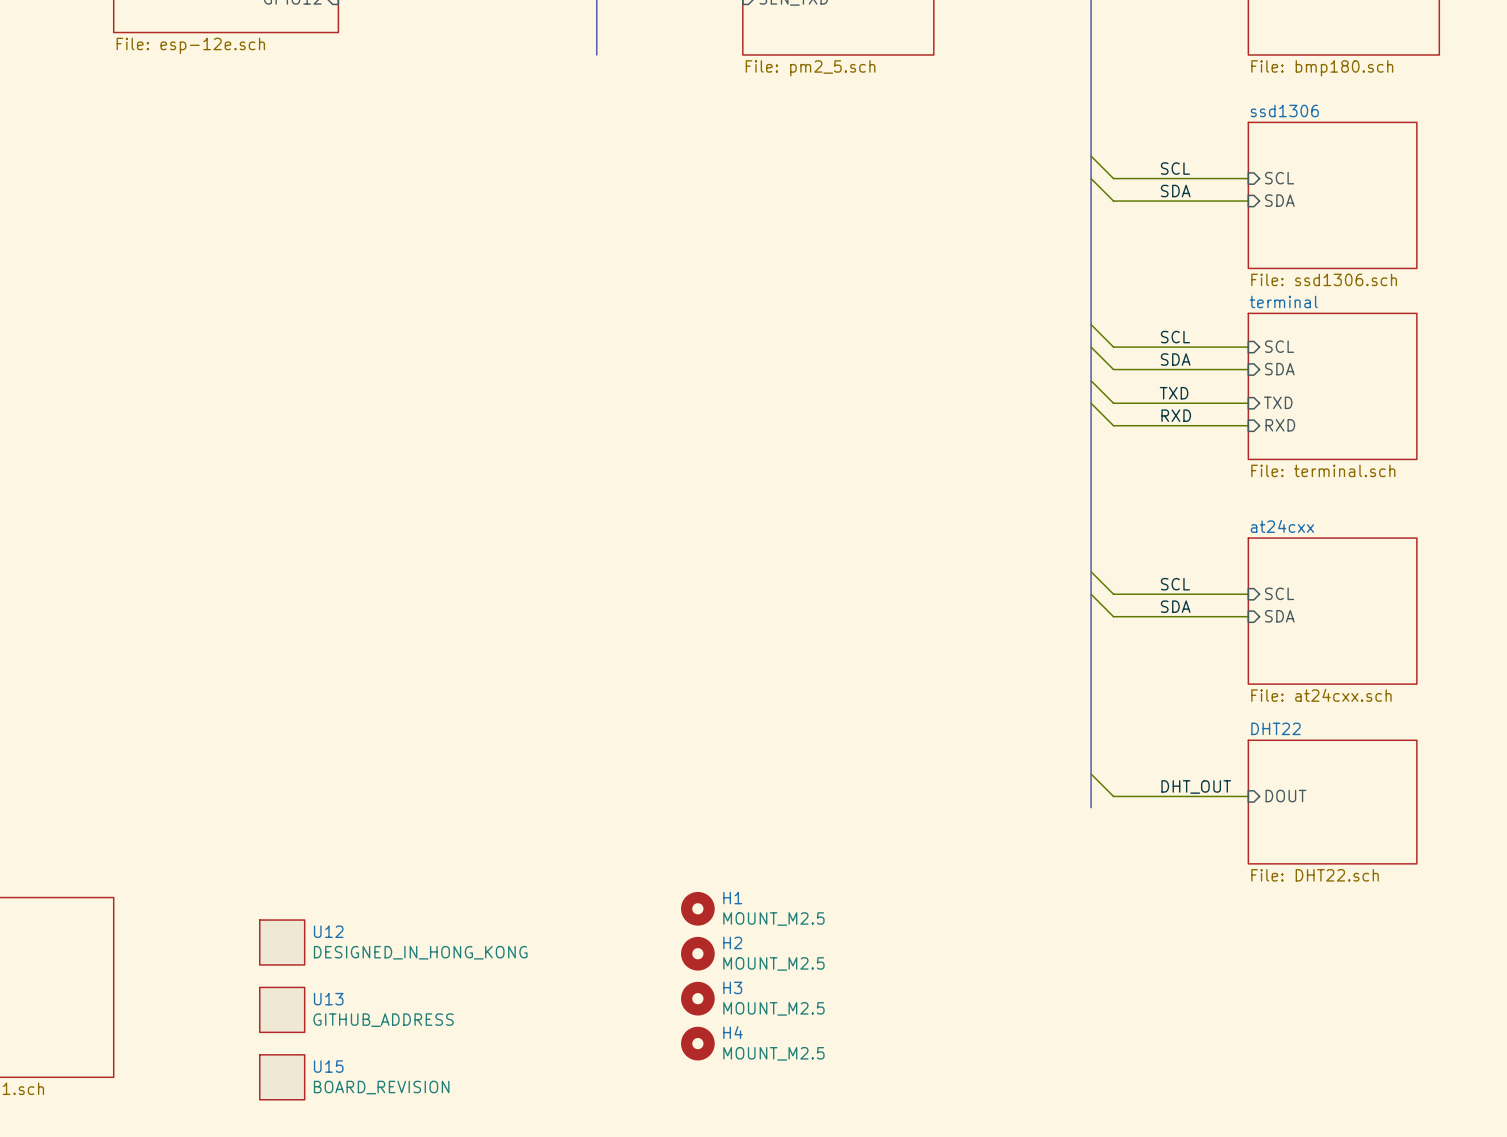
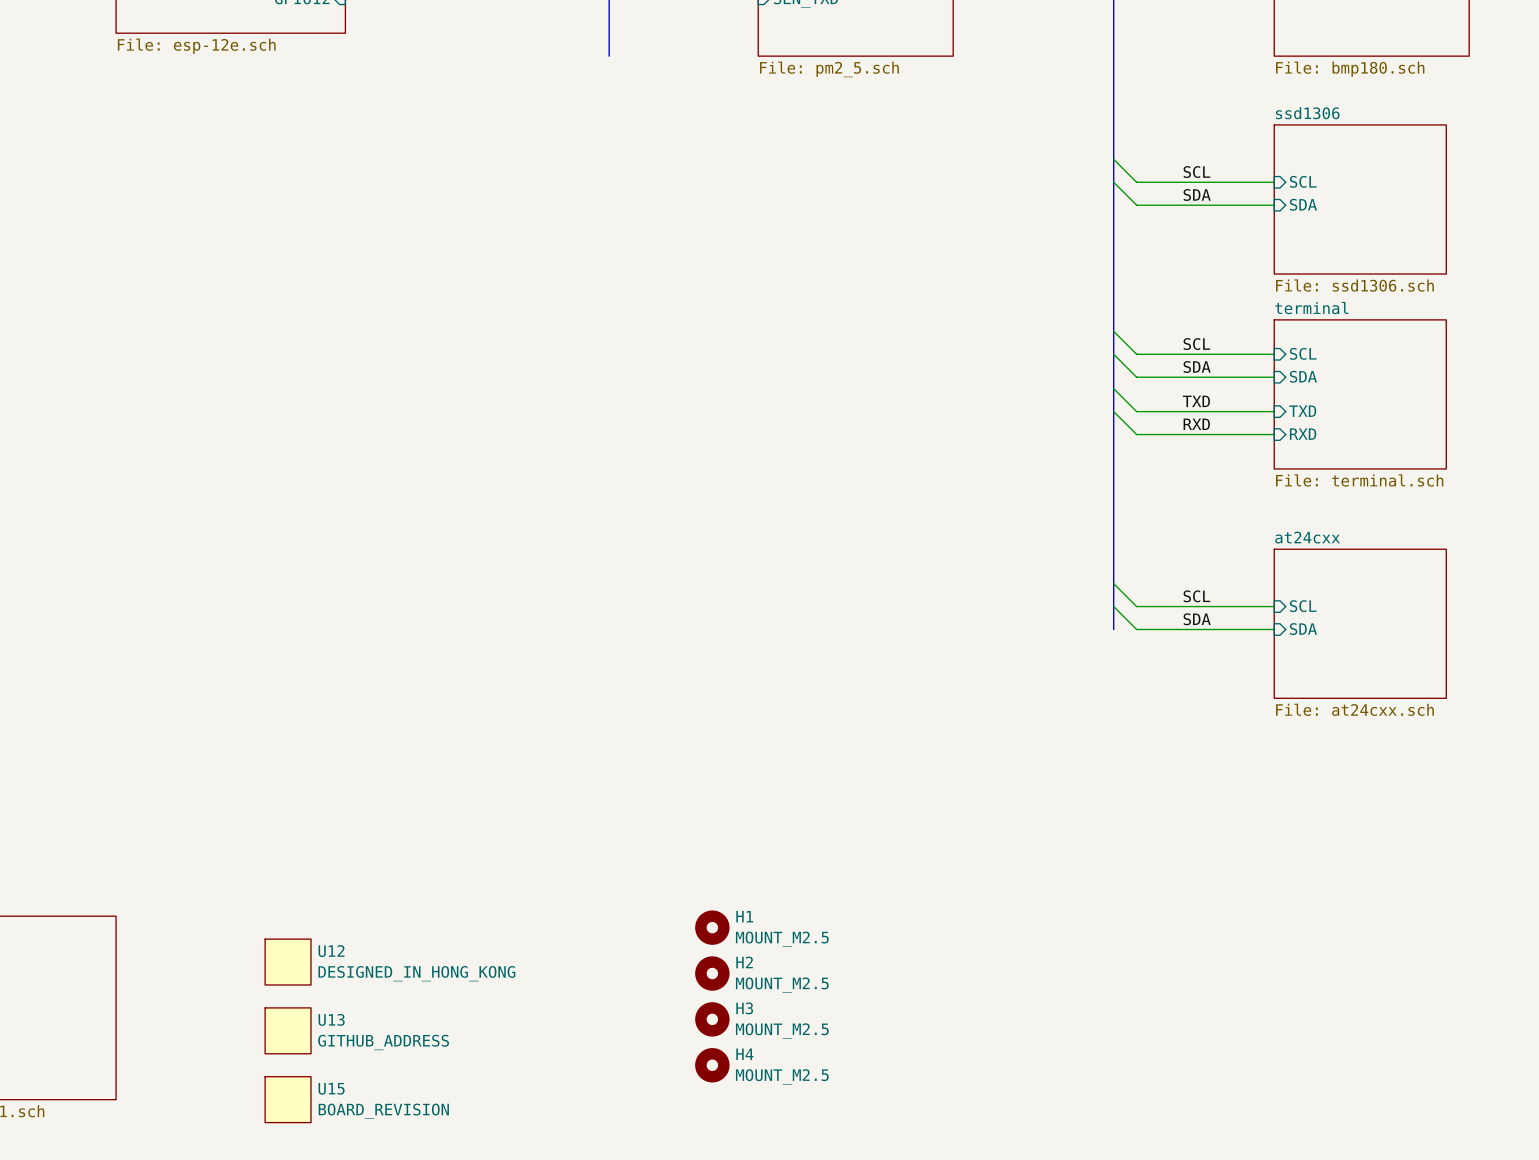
bus: (1091, 616) (1091, 807) -> none
wire: (1091, 773) (1113, 796) (1248, 796) -> none
label: DHT_OUT (1196, 786) -> none
sheet pin: DOUT (1285, 796) -> none
sheet DHT22: File: DHT22.sch (1332, 802) -> none

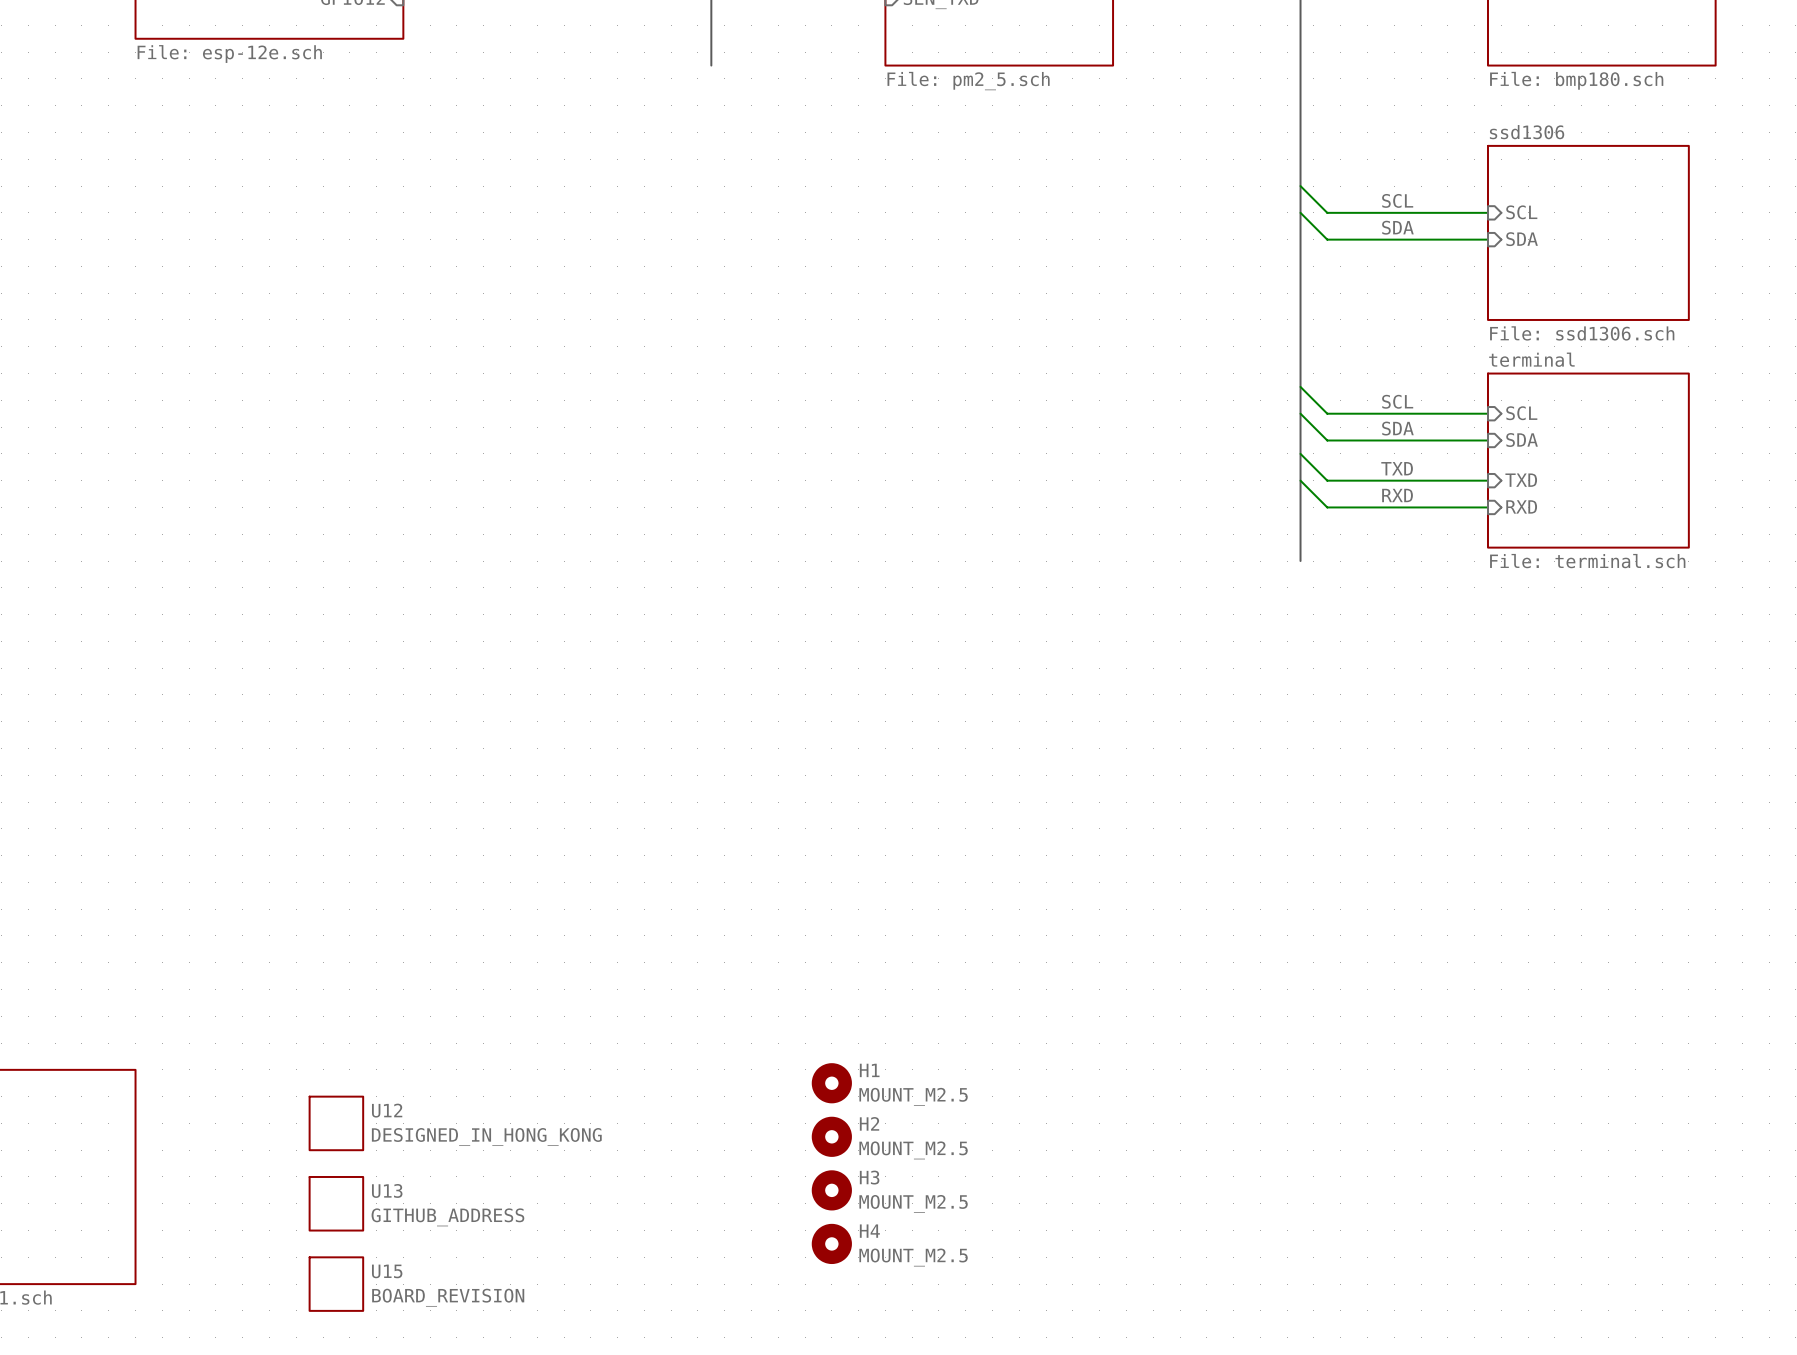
bus: (1113, 480) (1113, 629) -> none
wire: (1113, 583) (1136, 606) (1274, 606) -> none
label: SCL (1196, 596) -> none
wire: (1113, 606) (1136, 629) (1274, 629) -> none
sheet pin: SCL (1303, 606) -> none
label: SDA (1197, 619) -> none
sheet at24cxx: File: at24cxx.sch (1360, 623) -> none
sheet pin: SDA (1303, 629) -> none

